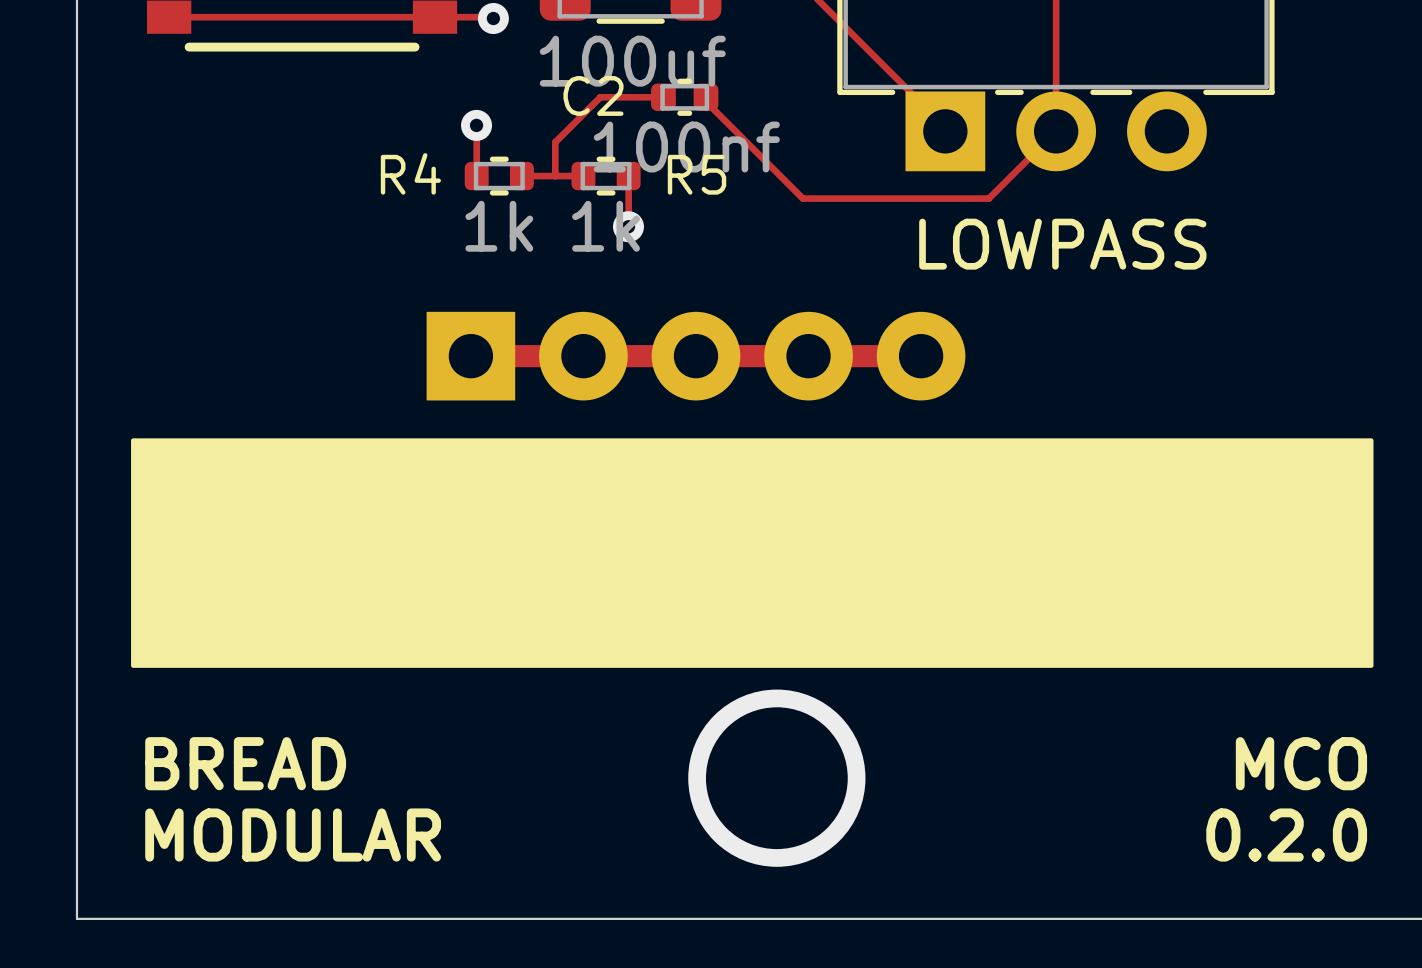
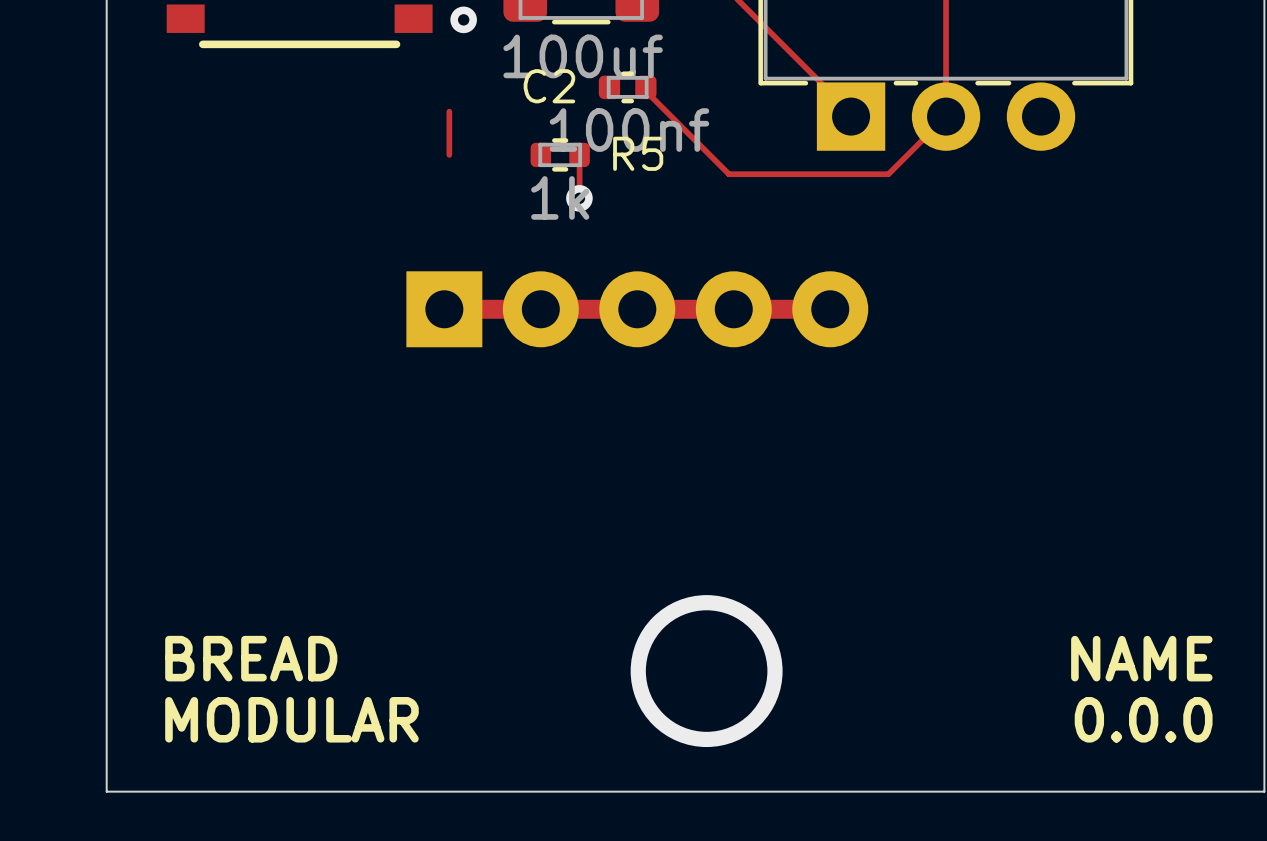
track: (169, 17) (493, 18) -> none
track: (663, 97) (600, 97) (555, 142) (555, 176) -> none
via: (476, 125) -> none
R4: 1k (499, 176) -> none
track: (521, 176) (583, 176) -> none
text: LOWPASS (1062, 244) -> none
drawing: [131, 438, 1374, 668] -> none
text: MCO (1301, 763) -> NAME (1141, 658)
text: 0.2.0 (1286, 835) -> 0.0.0 (1143, 719)

